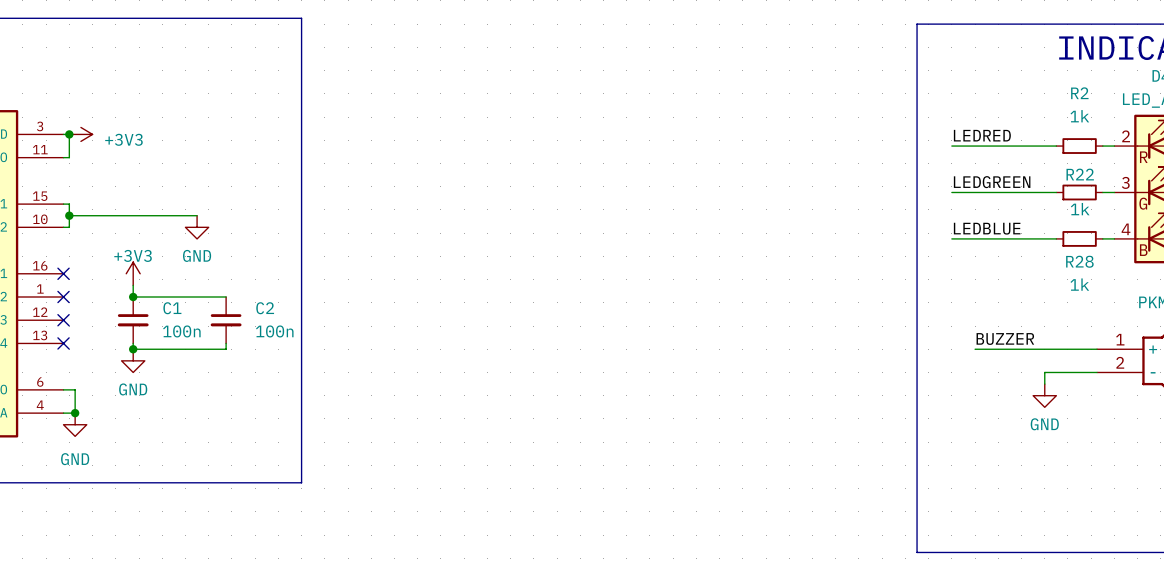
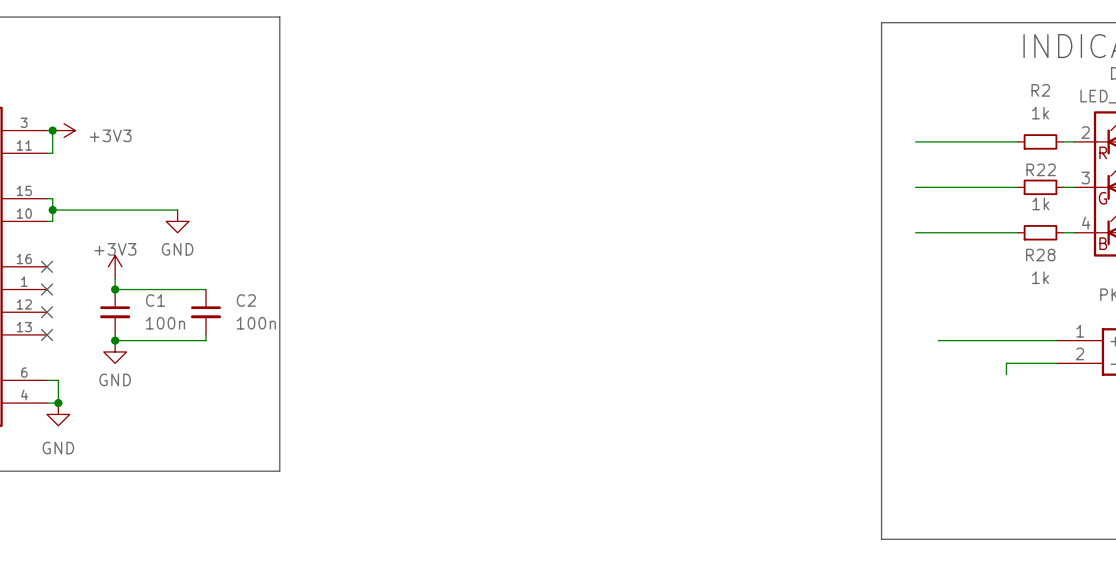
label: LEDRED (982, 135) -> none
label: LEDGREEN (992, 182) -> none
label: LEDBLUE (987, 228) -> none
label: BUZZER (1005, 338) -> none
power symbol: GND (1044, 395) -> none

